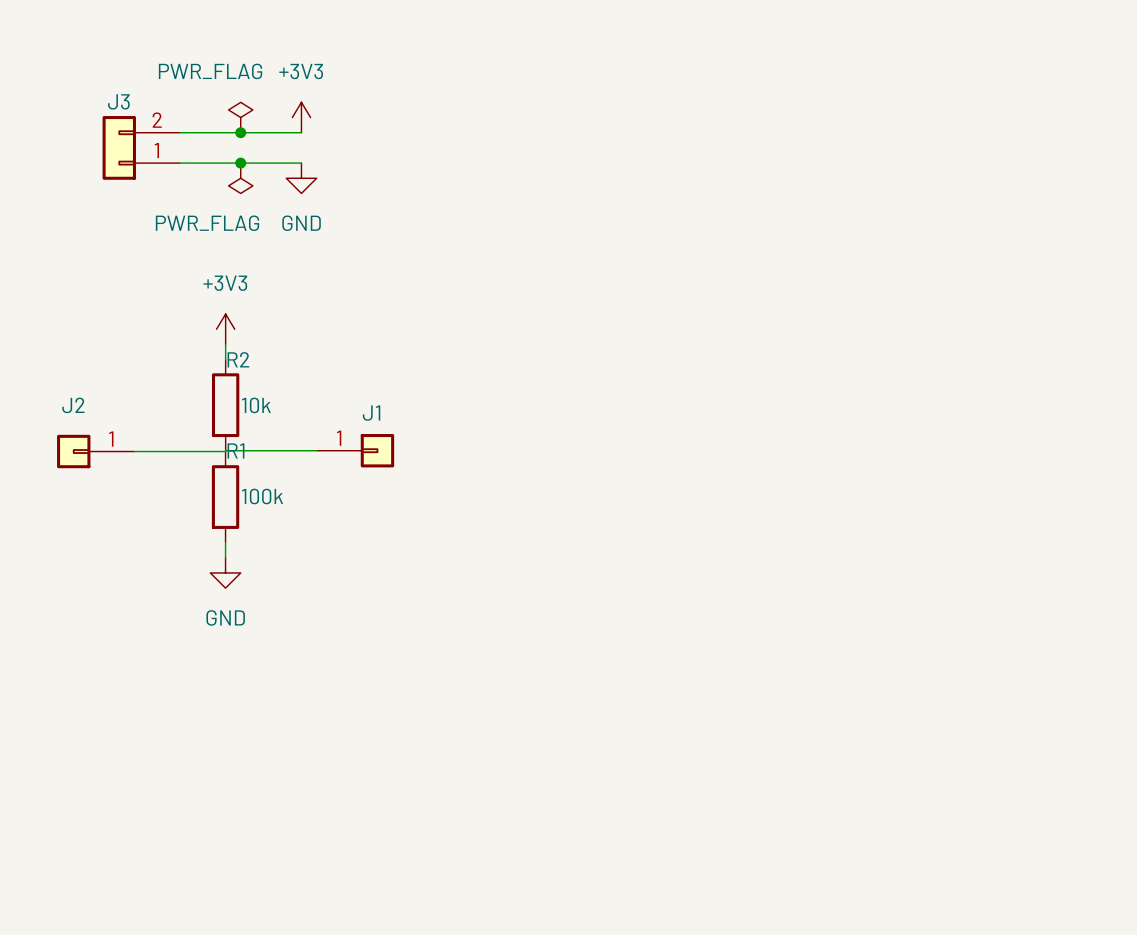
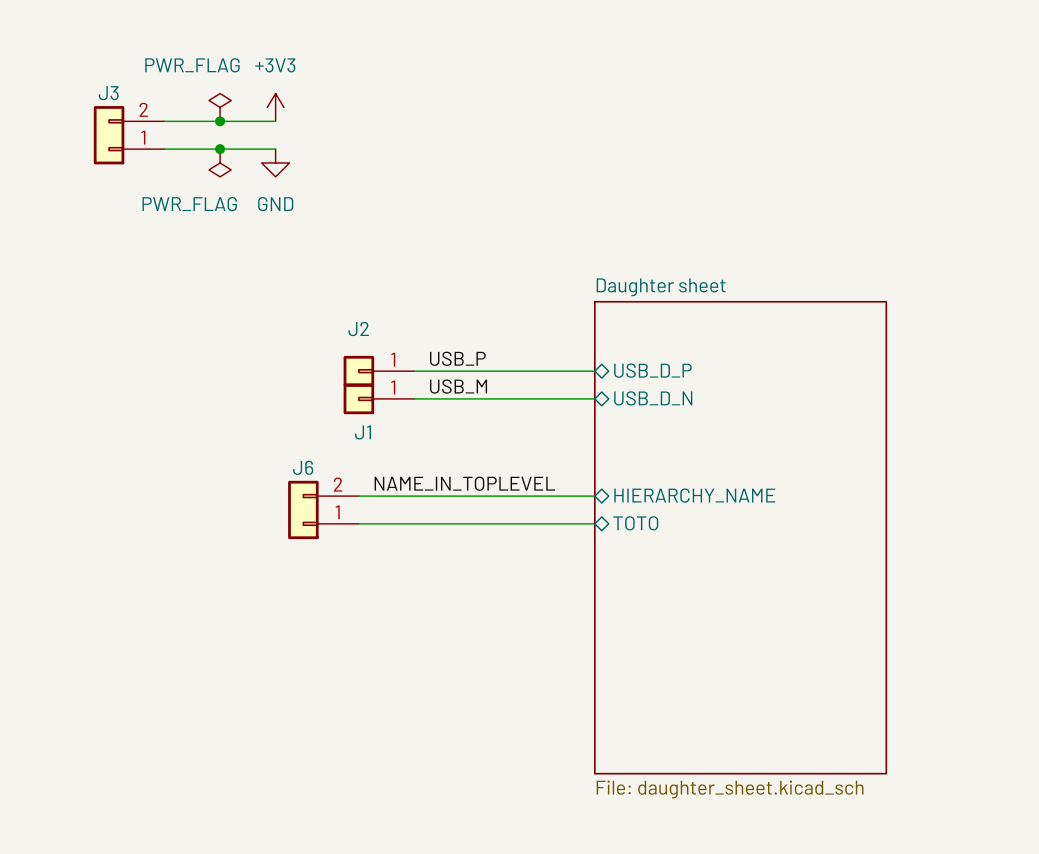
power symbol: +3V3 (225, 329) -> none
wire: (225, 344) (225, 359) -> none
label: none -> USB_P (457, 358)
R2: 10k (225, 405) -> none
wire: none -> (414, 371) (594, 371)
sheet pin: none -> USB_D_P (652, 370)
label: none -> USB_M (458, 386)
sheet pin: none -> USB_D_N (653, 398)
wire: none -> (414, 398) (594, 398)
wire: (225, 450) (316, 450) -> none
J1 position: (355, 450) -> (379, 398)
J1 rotation: 0° (377, 450) -> 180° (358, 398)
J2 position: (95, 451) -> (379, 371)
wire: (134, 451) (225, 451) -> none
R1: 100k (225, 497) -> none
label: none -> NAME_IN_TOPLEVEL (464, 483)
wire: (225, 542) (225, 557) -> none
wire: none -> (358, 496) (594, 496)
sheet pin: none -> HIERARCHY_NAME (694, 495)
J6: none -> (323, 509)
power symbol: GND (225, 572) -> none
wire: none -> (358, 523) (594, 523)
sheet pin: none -> TOTO (635, 523)
sheet Daughter sheet: none -> File: daughter_sheet.kicad_sch (740, 537)

